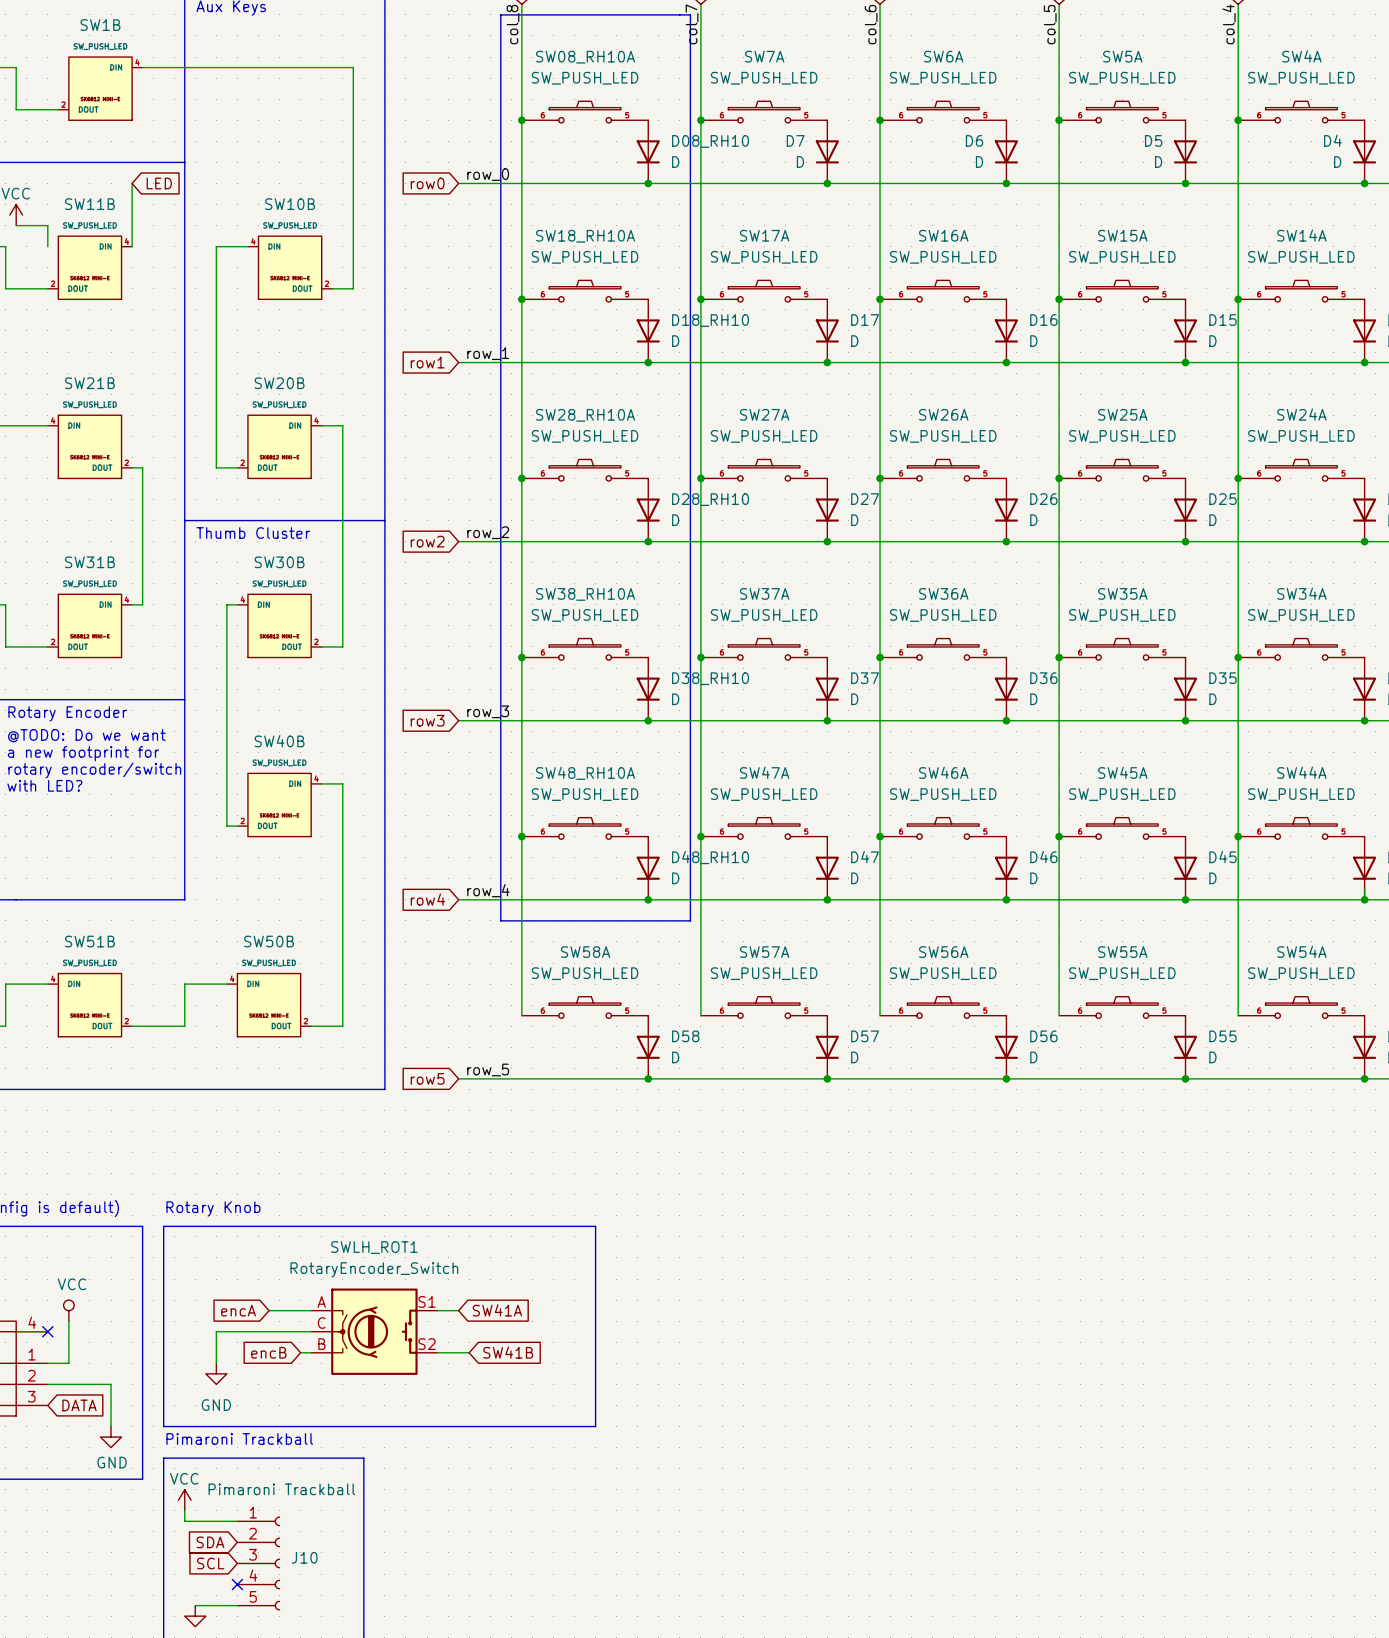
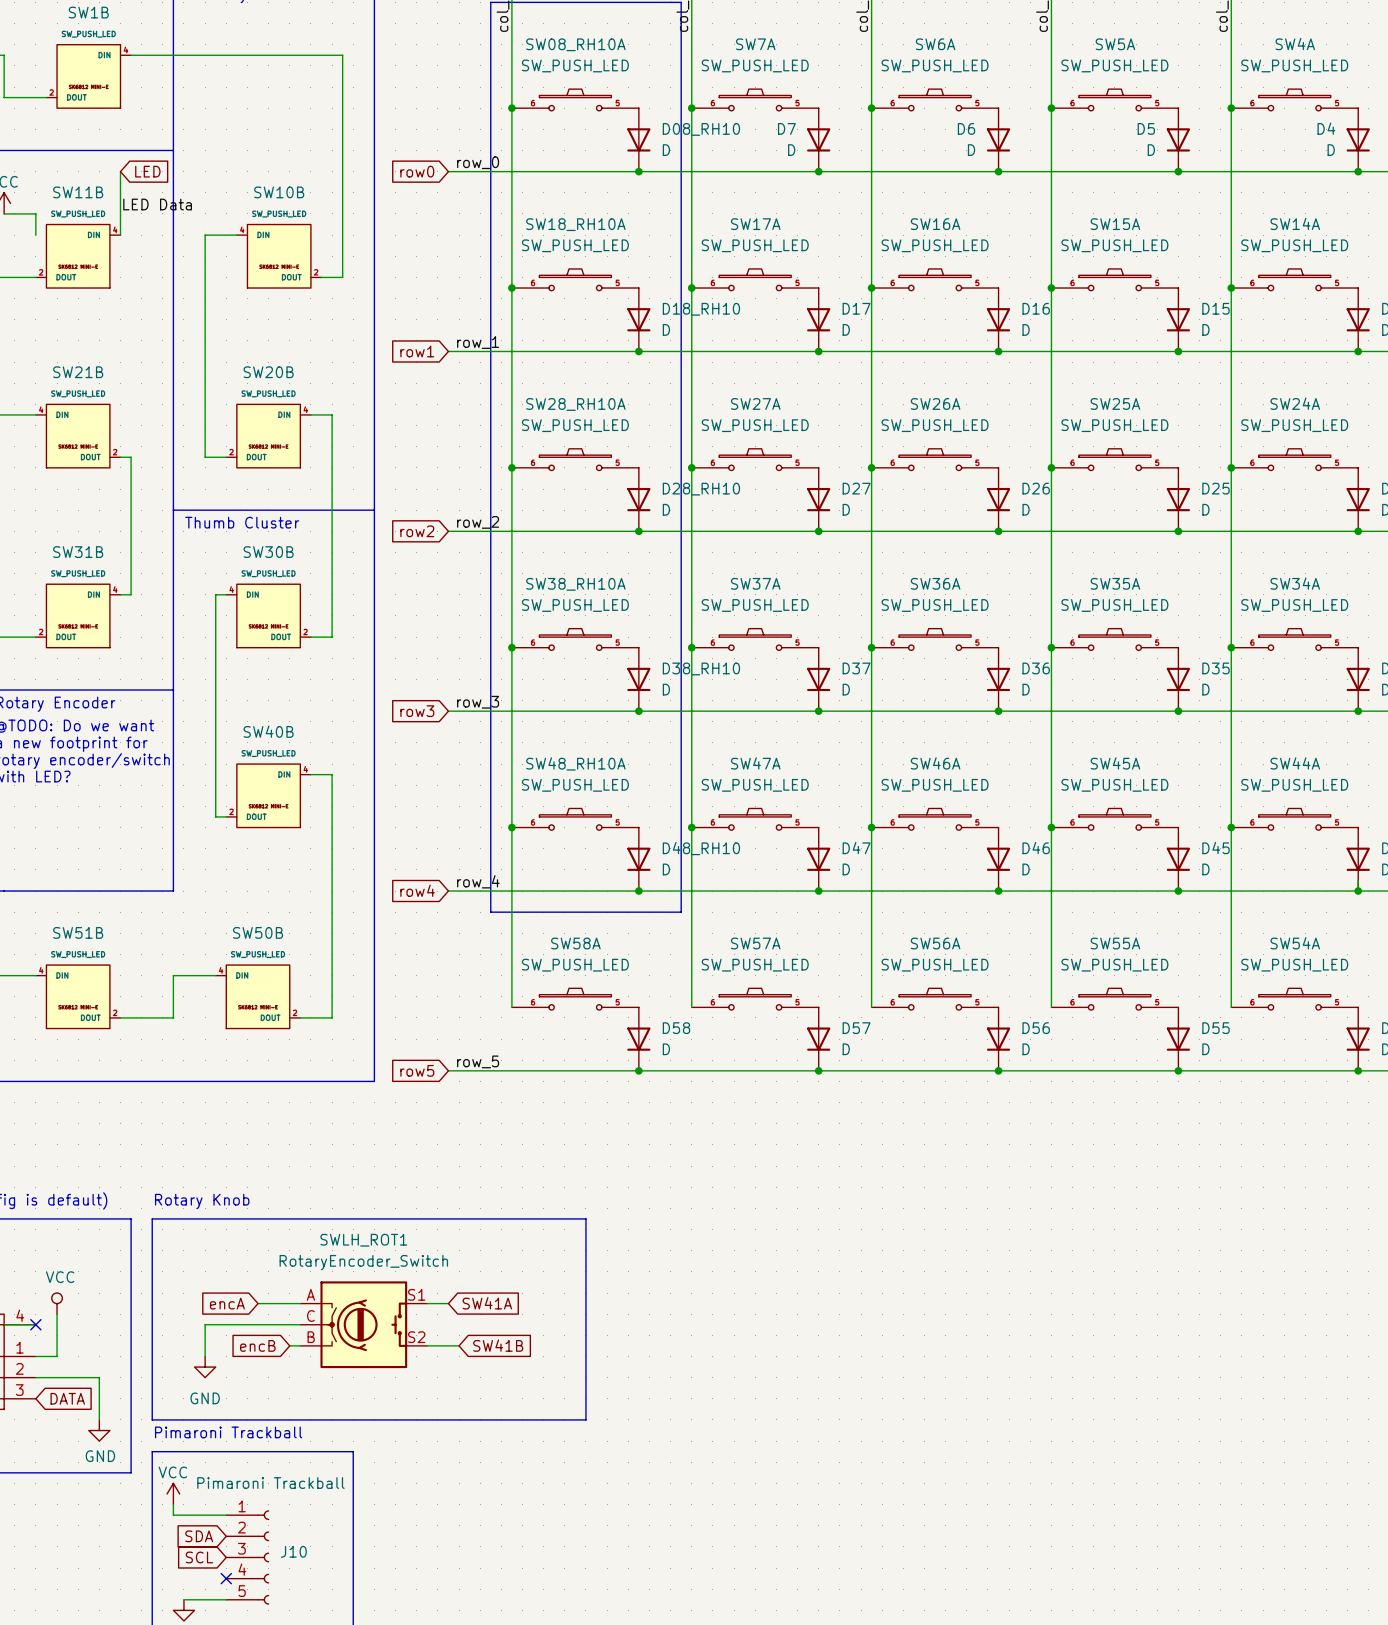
label: none -> LED Data (157, 204)

